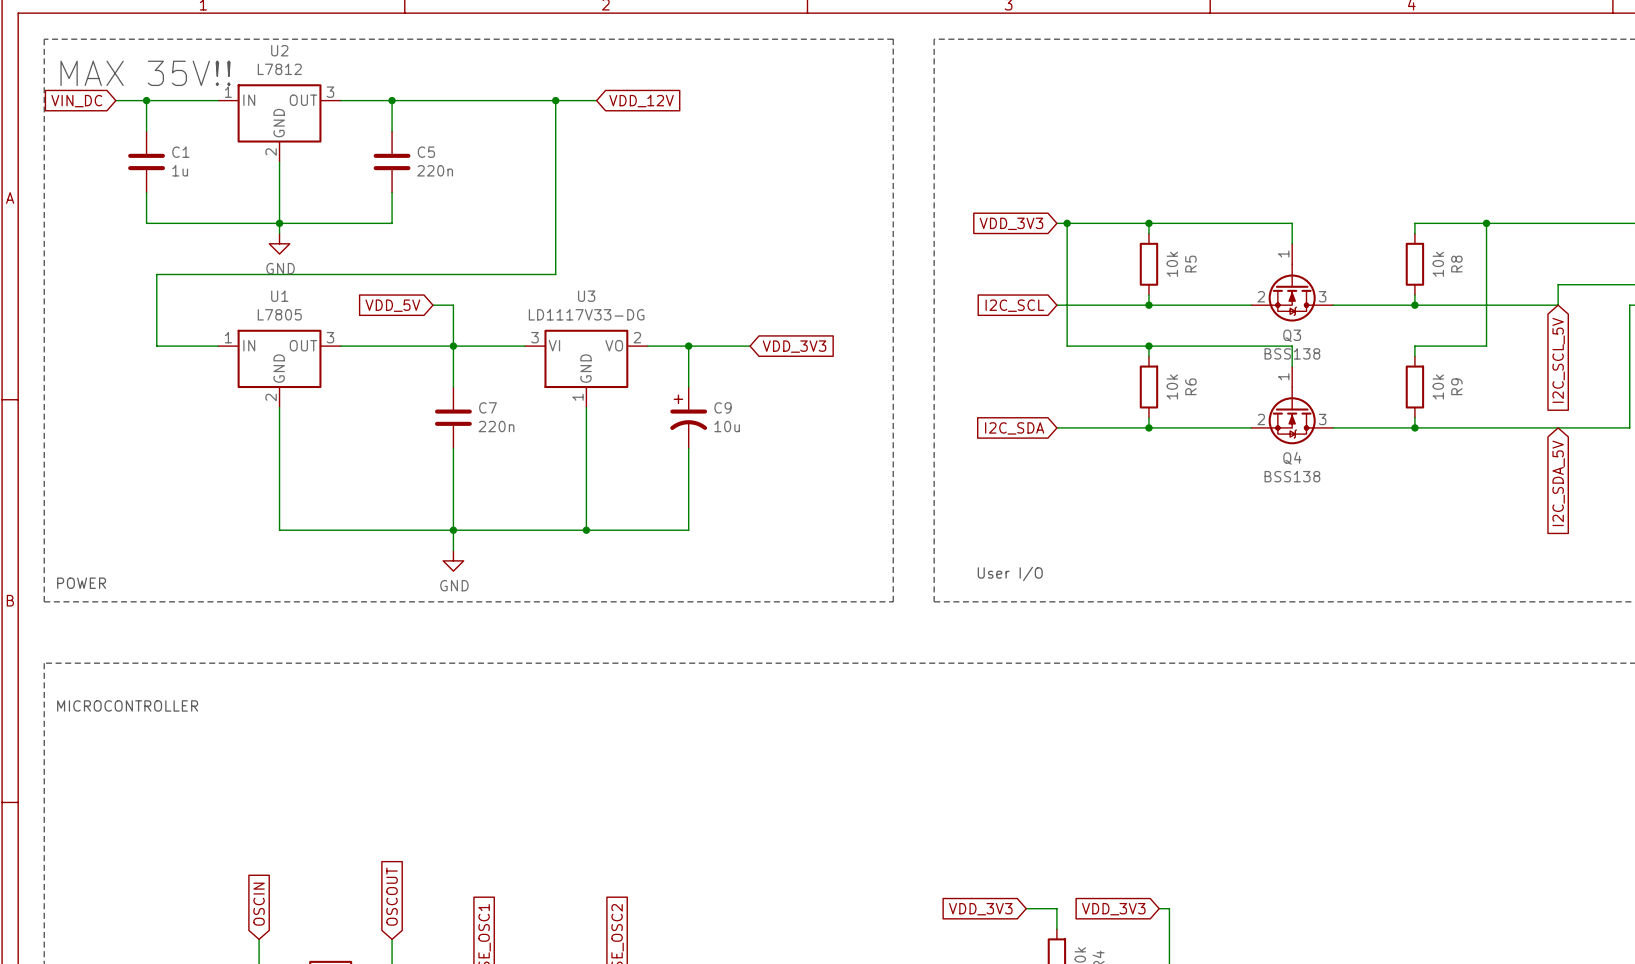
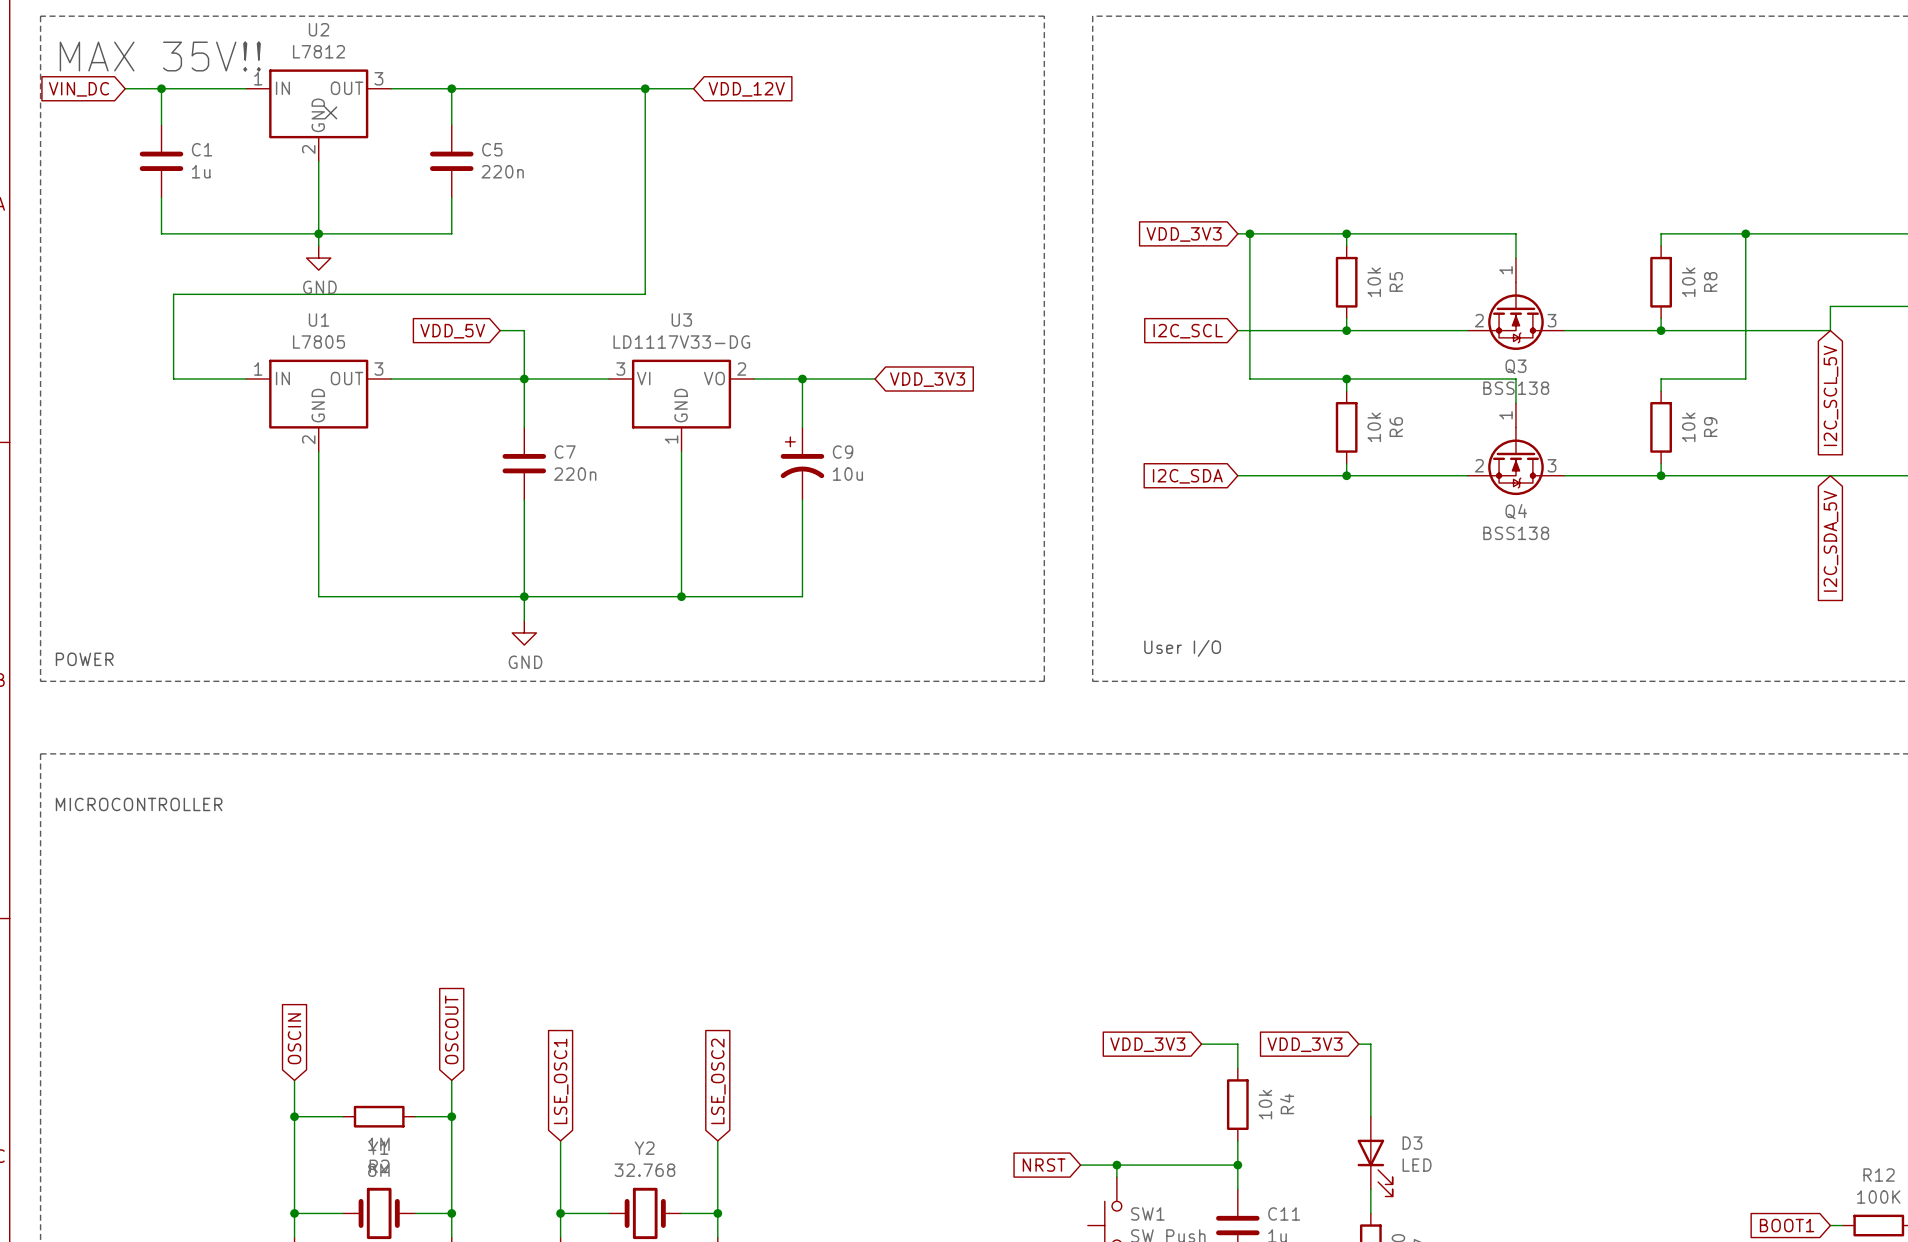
no-connect mark: none -> (330, 112)

